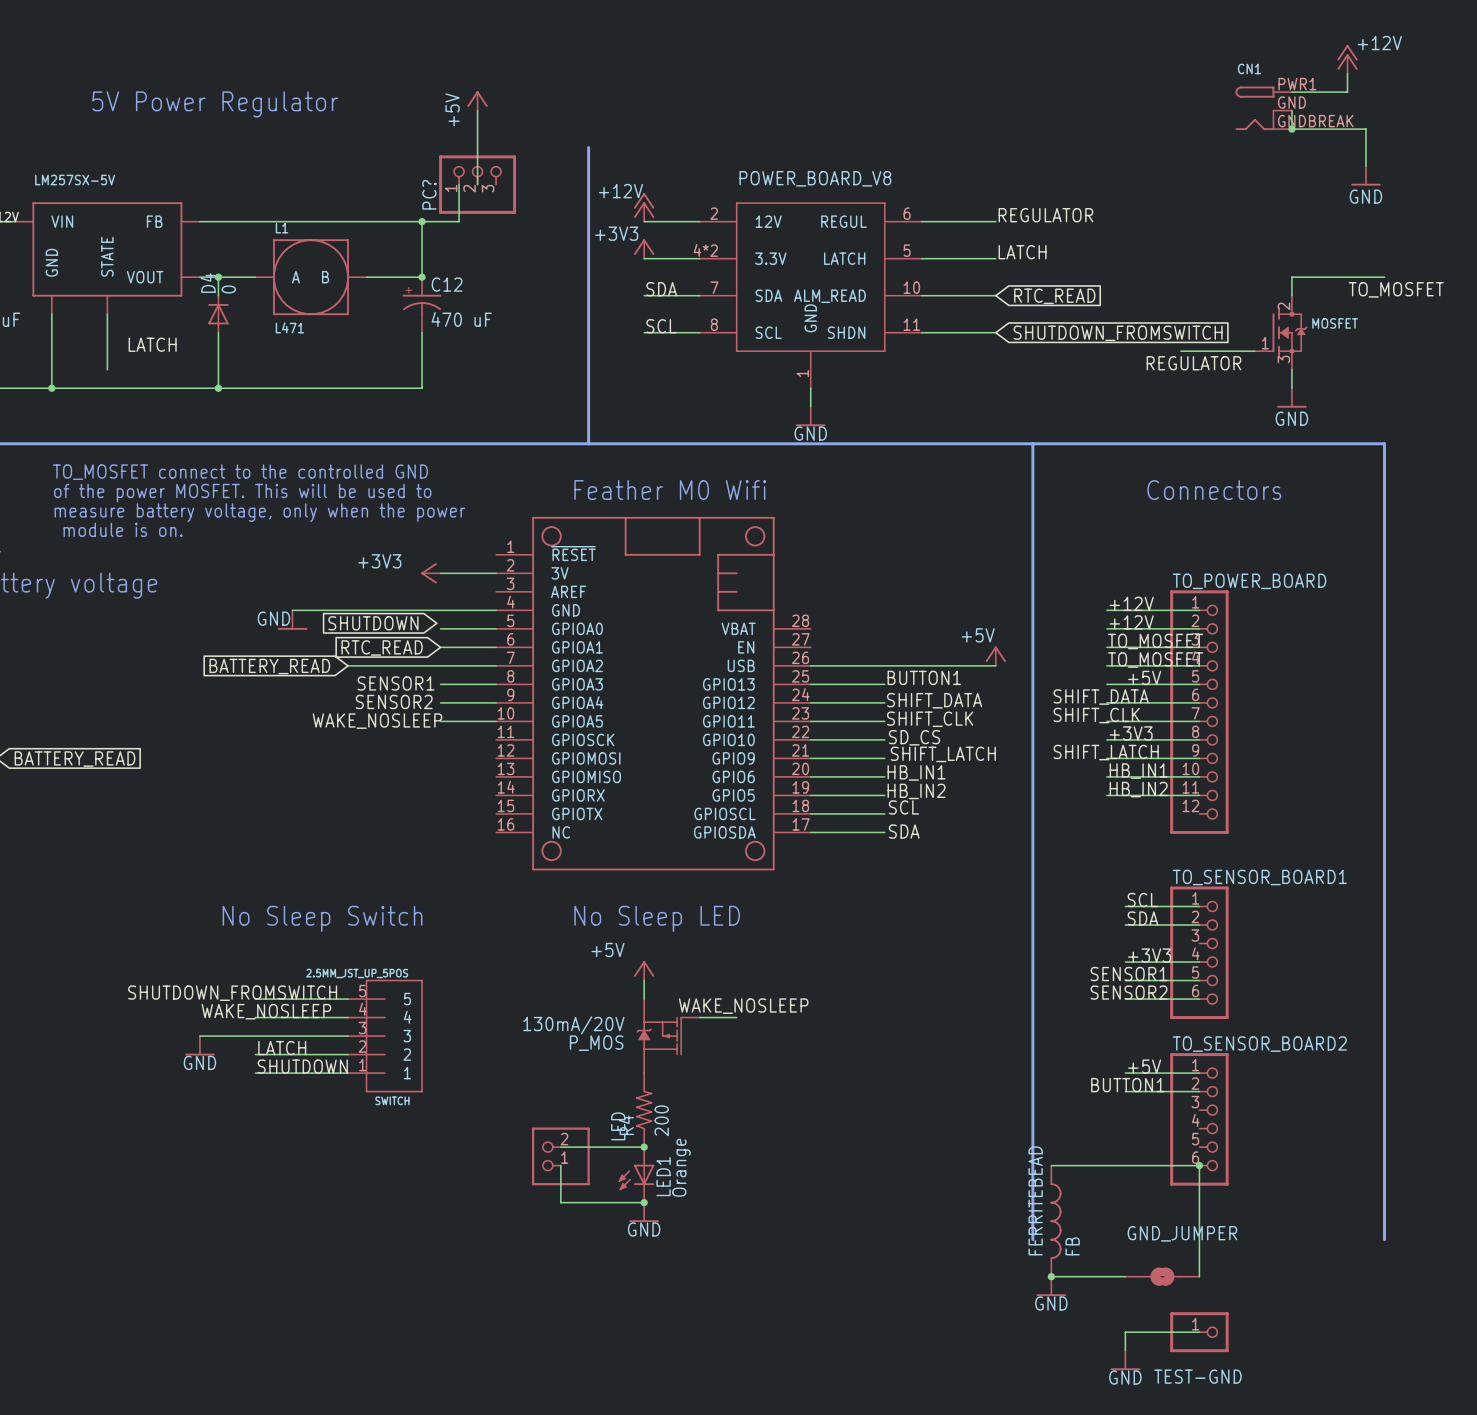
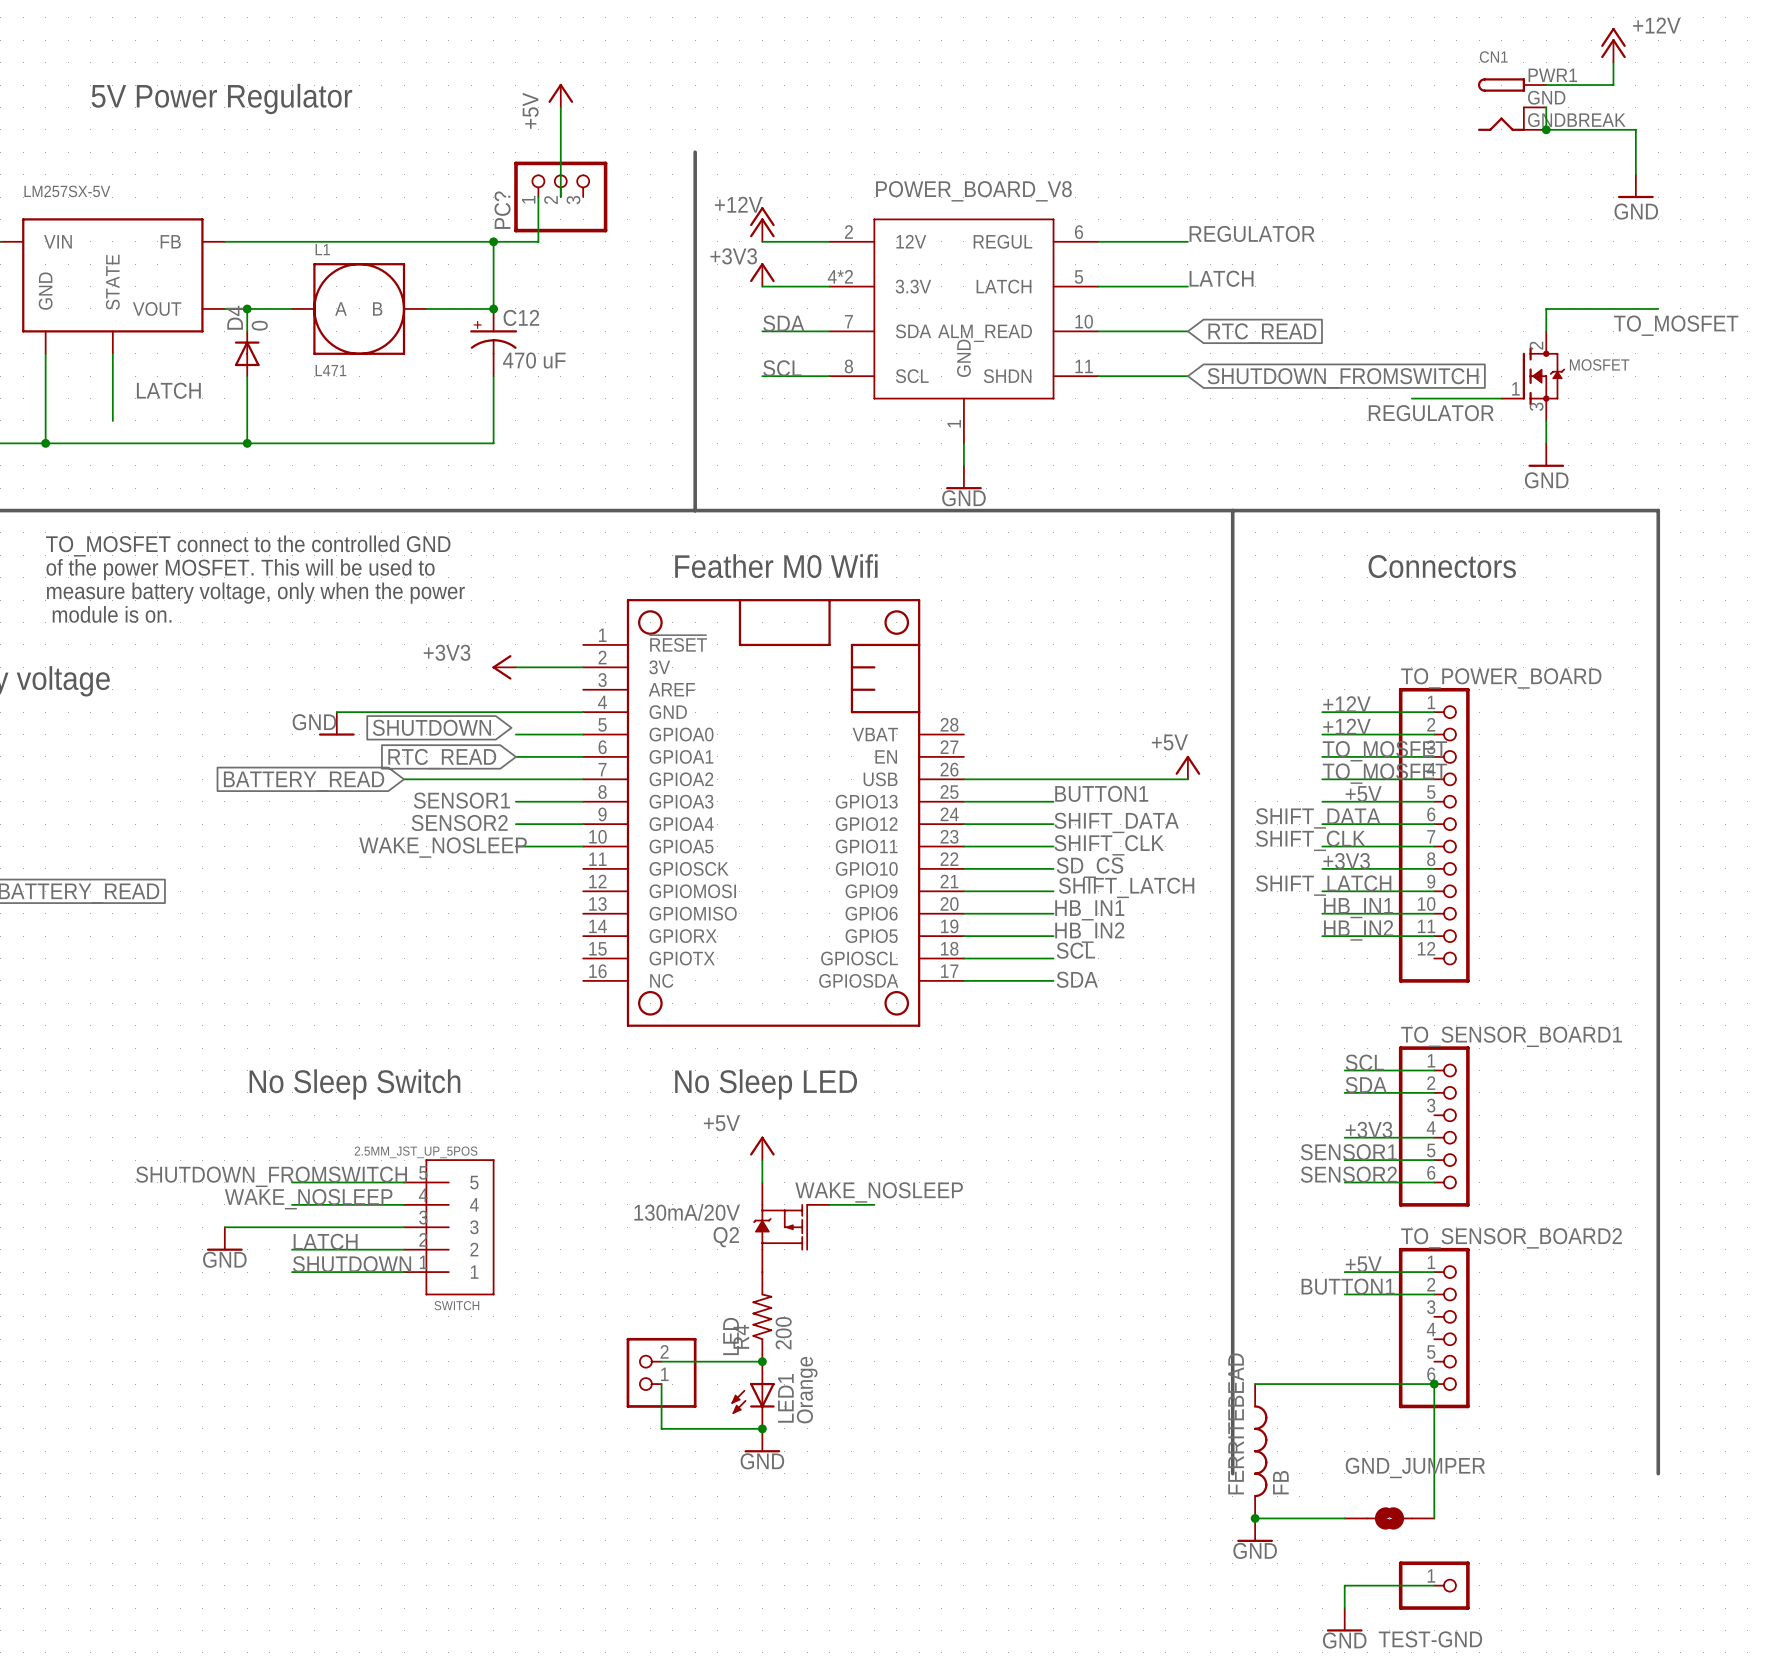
P_MOS name: P_MOS (596, 1043) -> Q2 (726, 1237)

